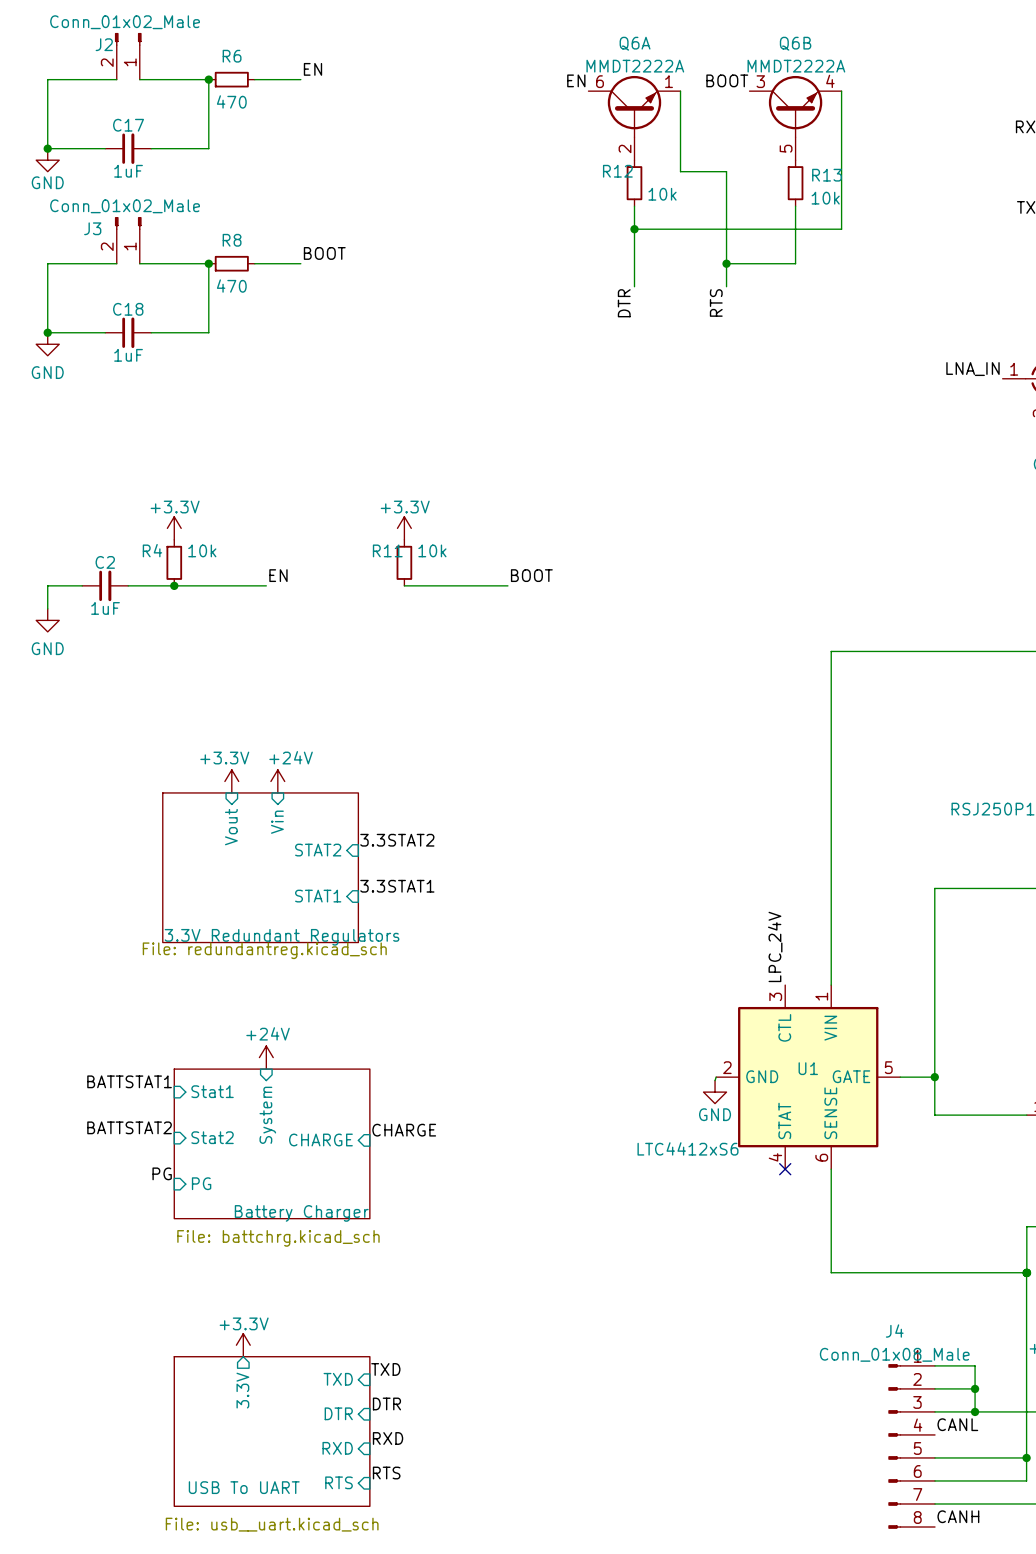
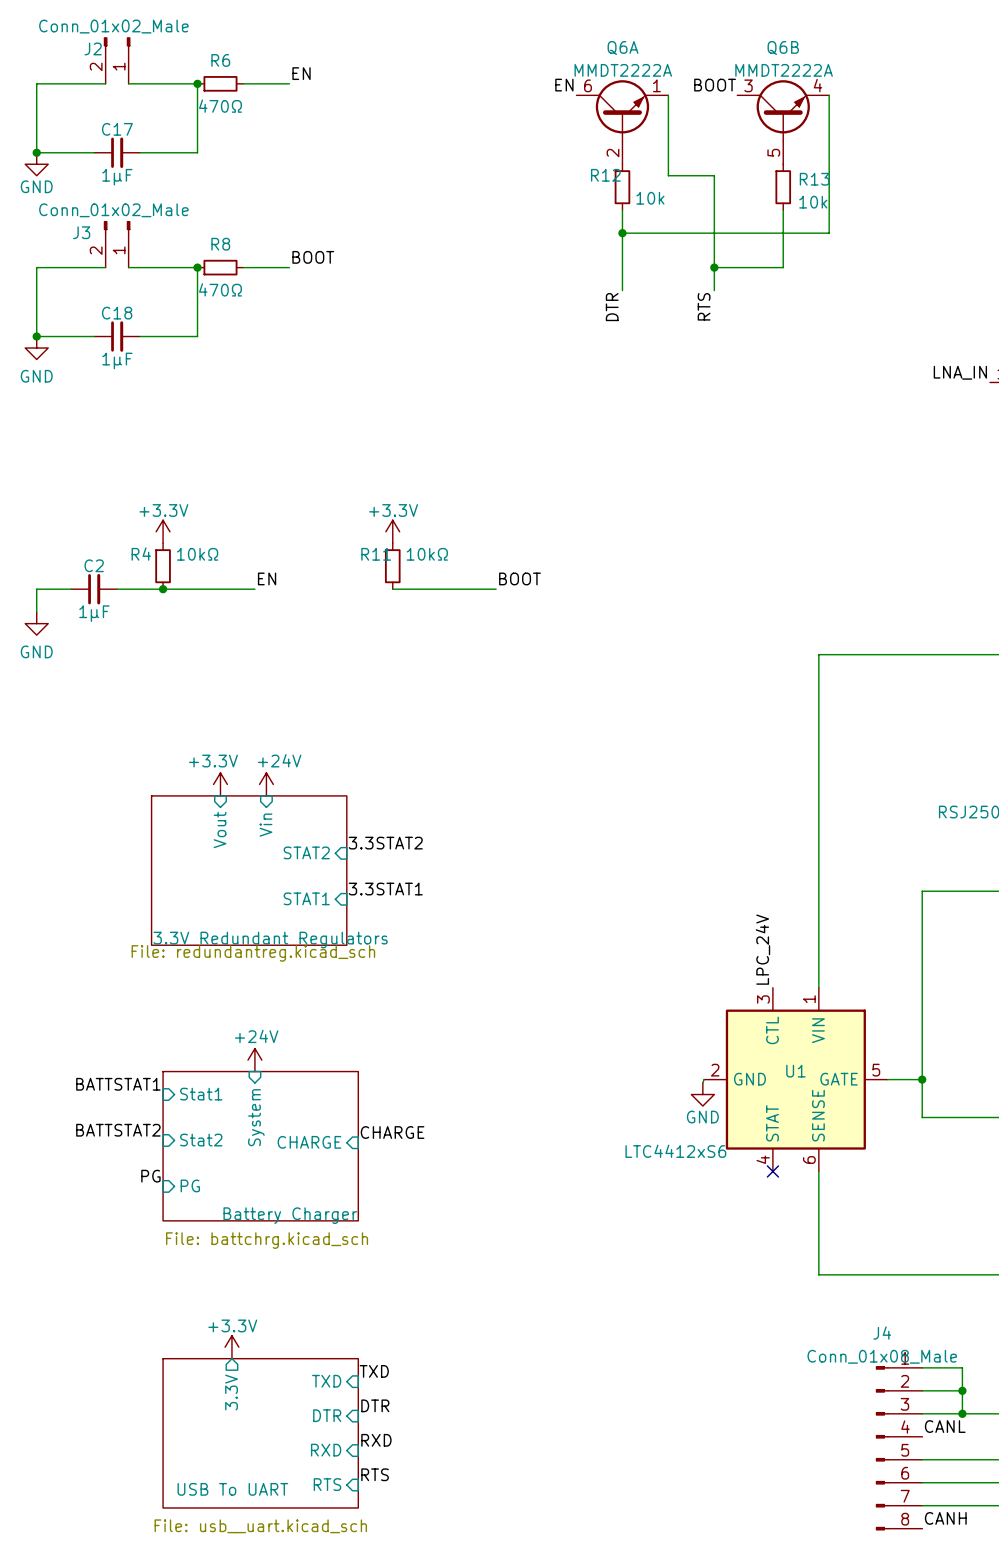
R6 value: 470 (231, 101) -> 470Ω (220, 106)
C17 value: 1uF (128, 171) -> 1μF (117, 177)
R8 value: 470 (231, 286) -> 470Ω (220, 289)
C18 value: 1uF (128, 355) -> 1μF (117, 360)
R4 value: 10k (202, 550) -> 10kΩ (197, 554)
R11 value: 10k (432, 550) -> 10kΩ (427, 554)
C2 value: 1uF (105, 608) -> 1μF (94, 613)

